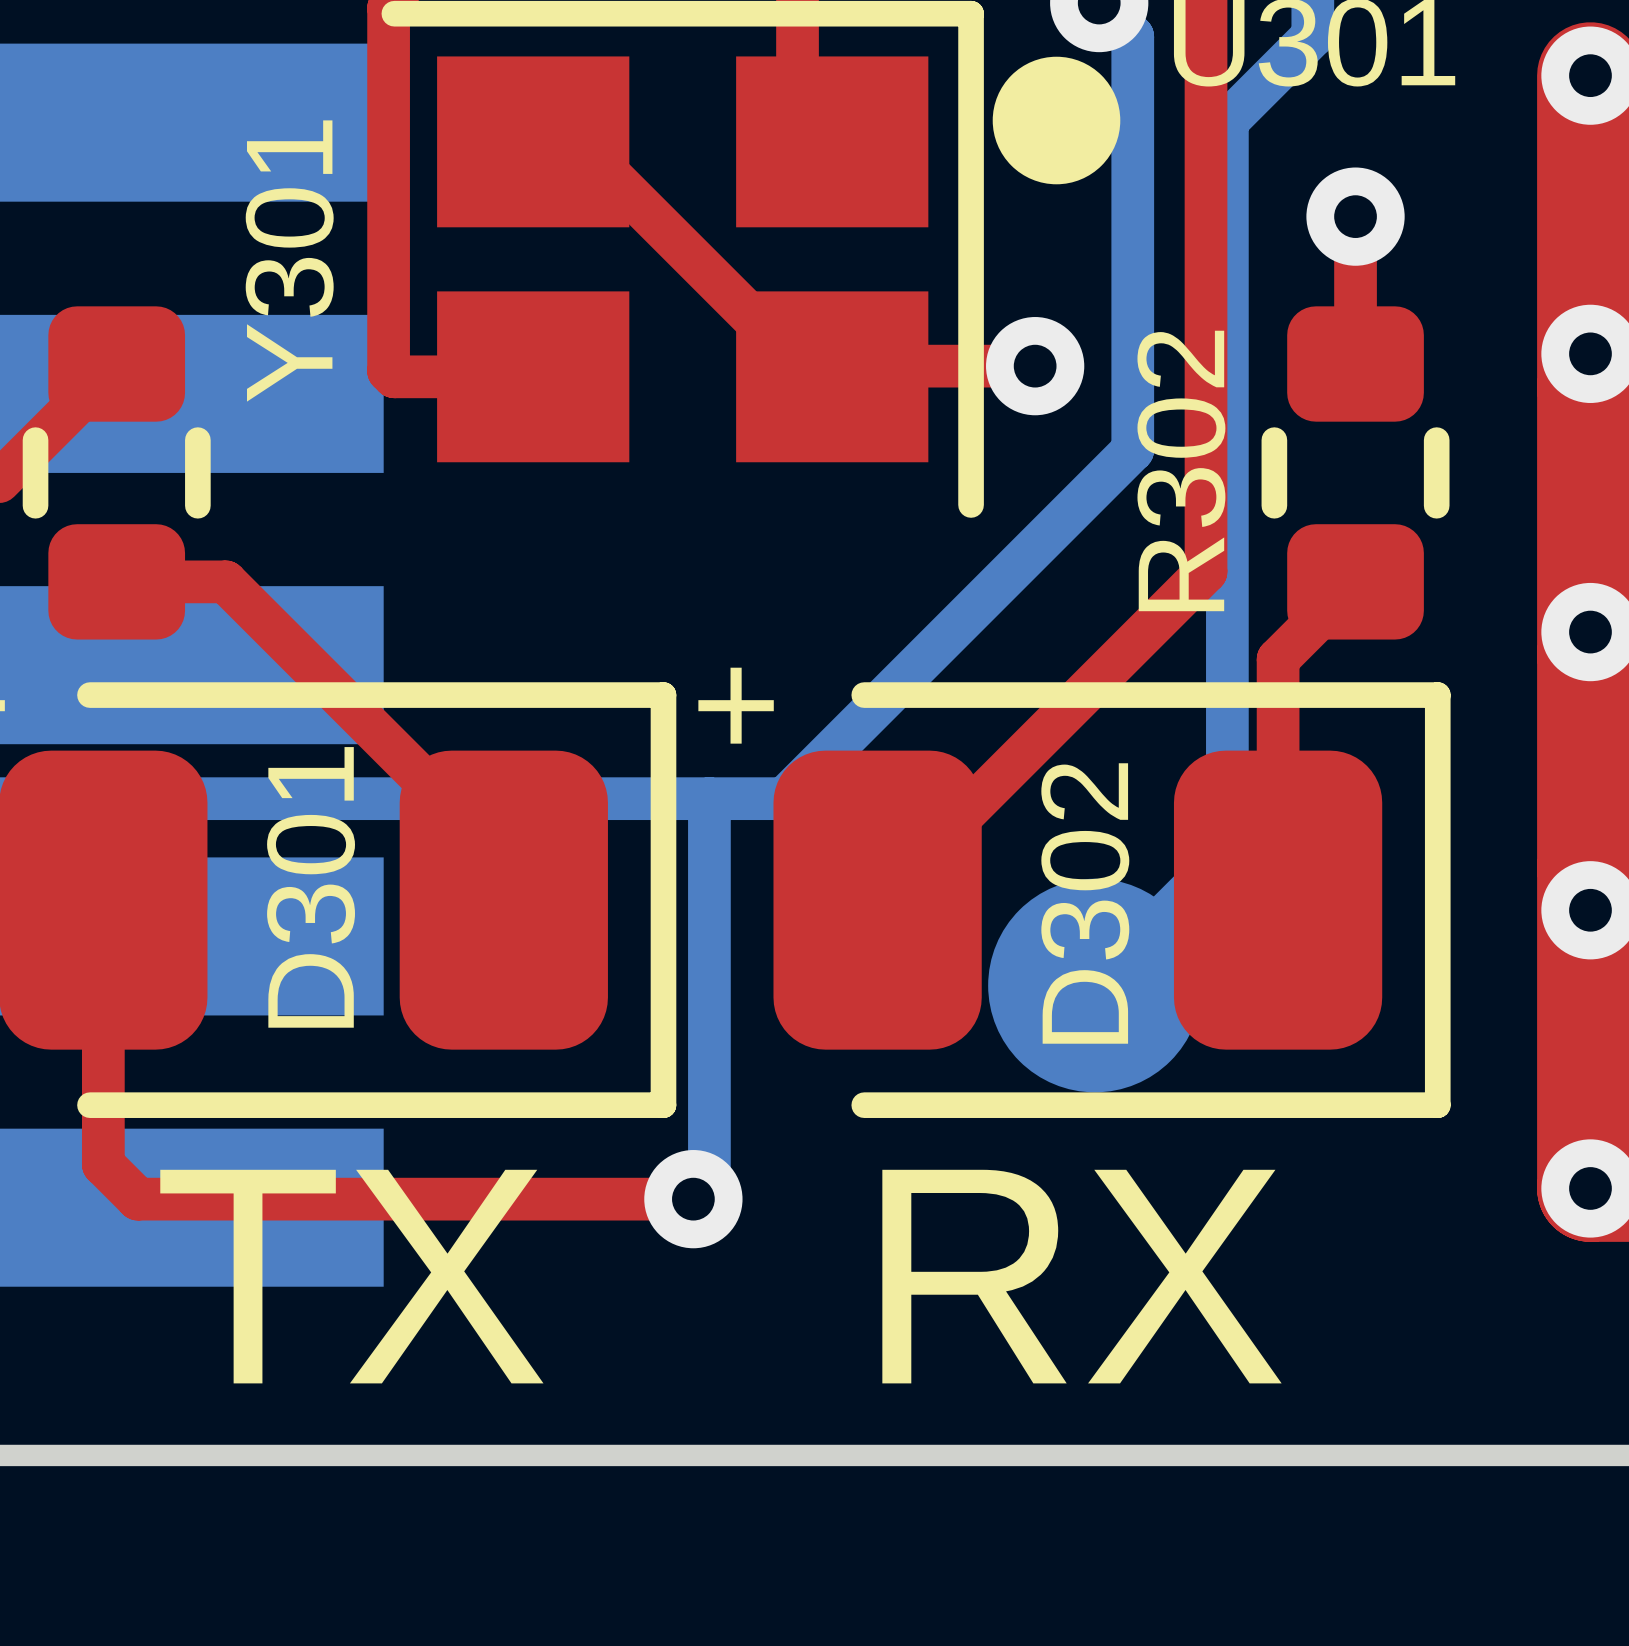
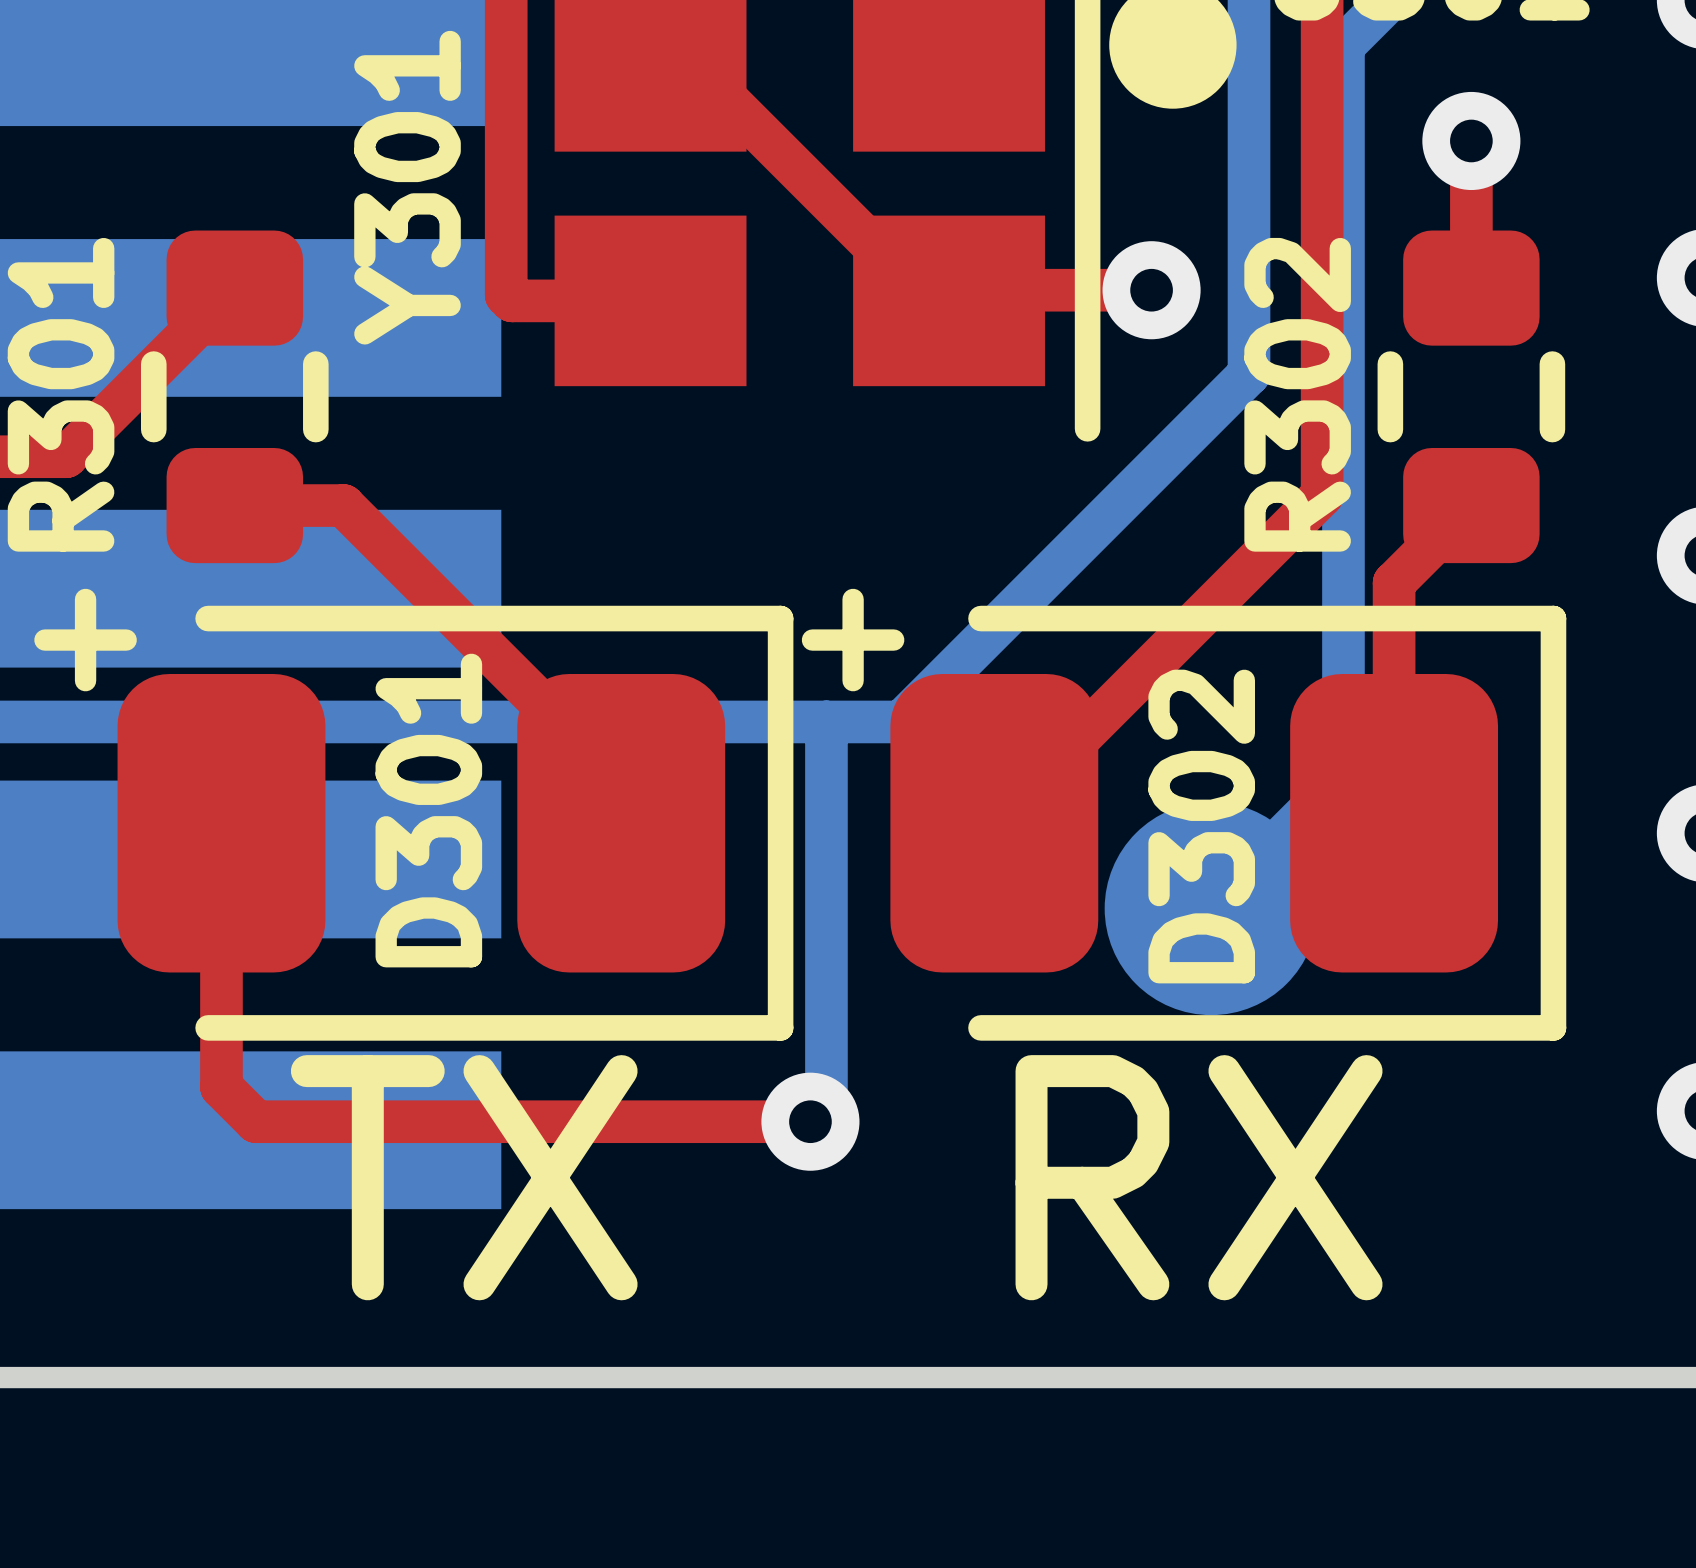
text position: TX (351, 1276) -> TX (464, 1177)
text position: RX (1081, 1276) -> RX (1199, 1177)

